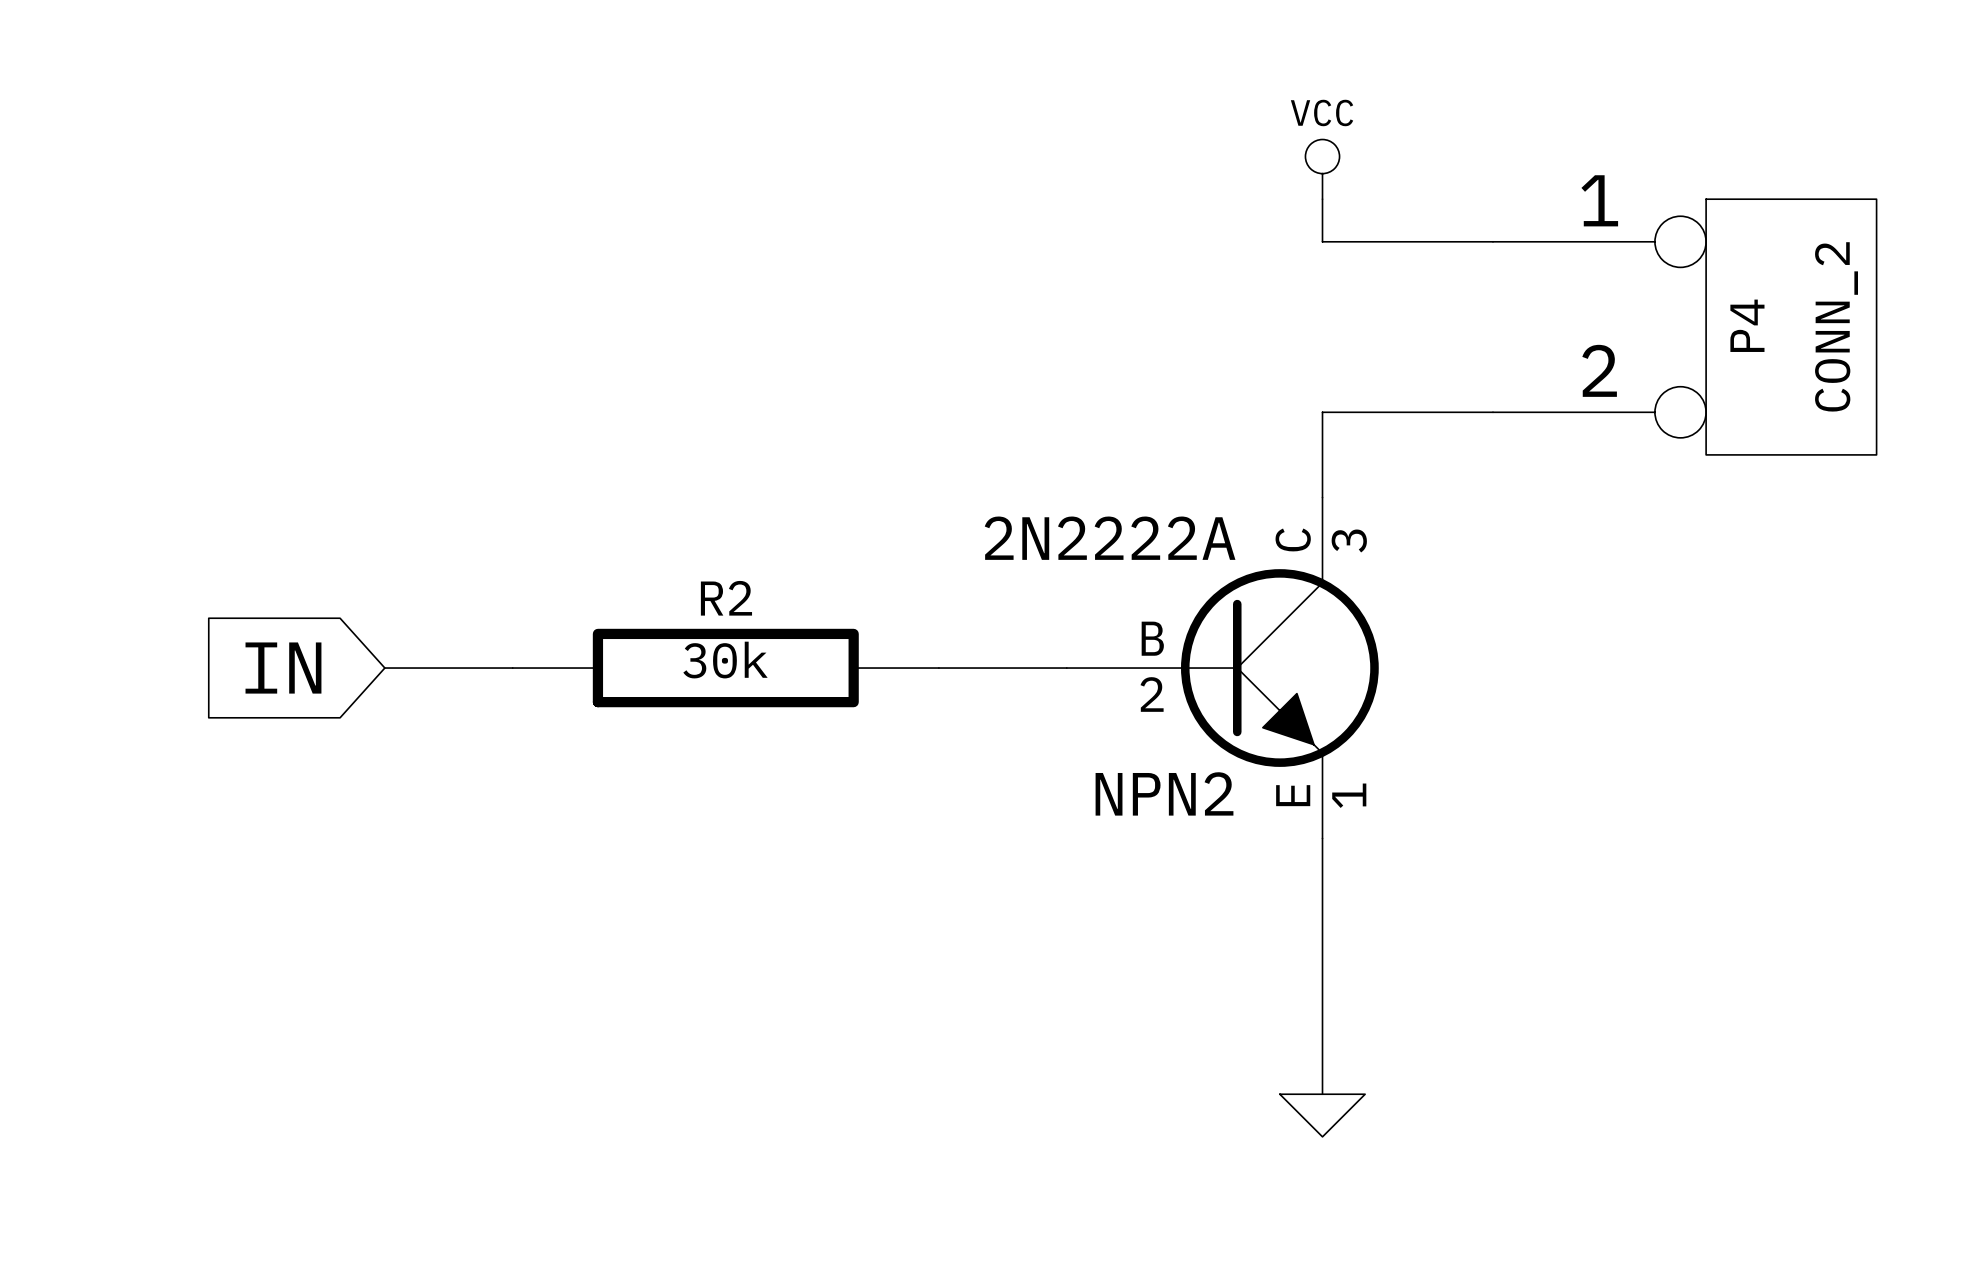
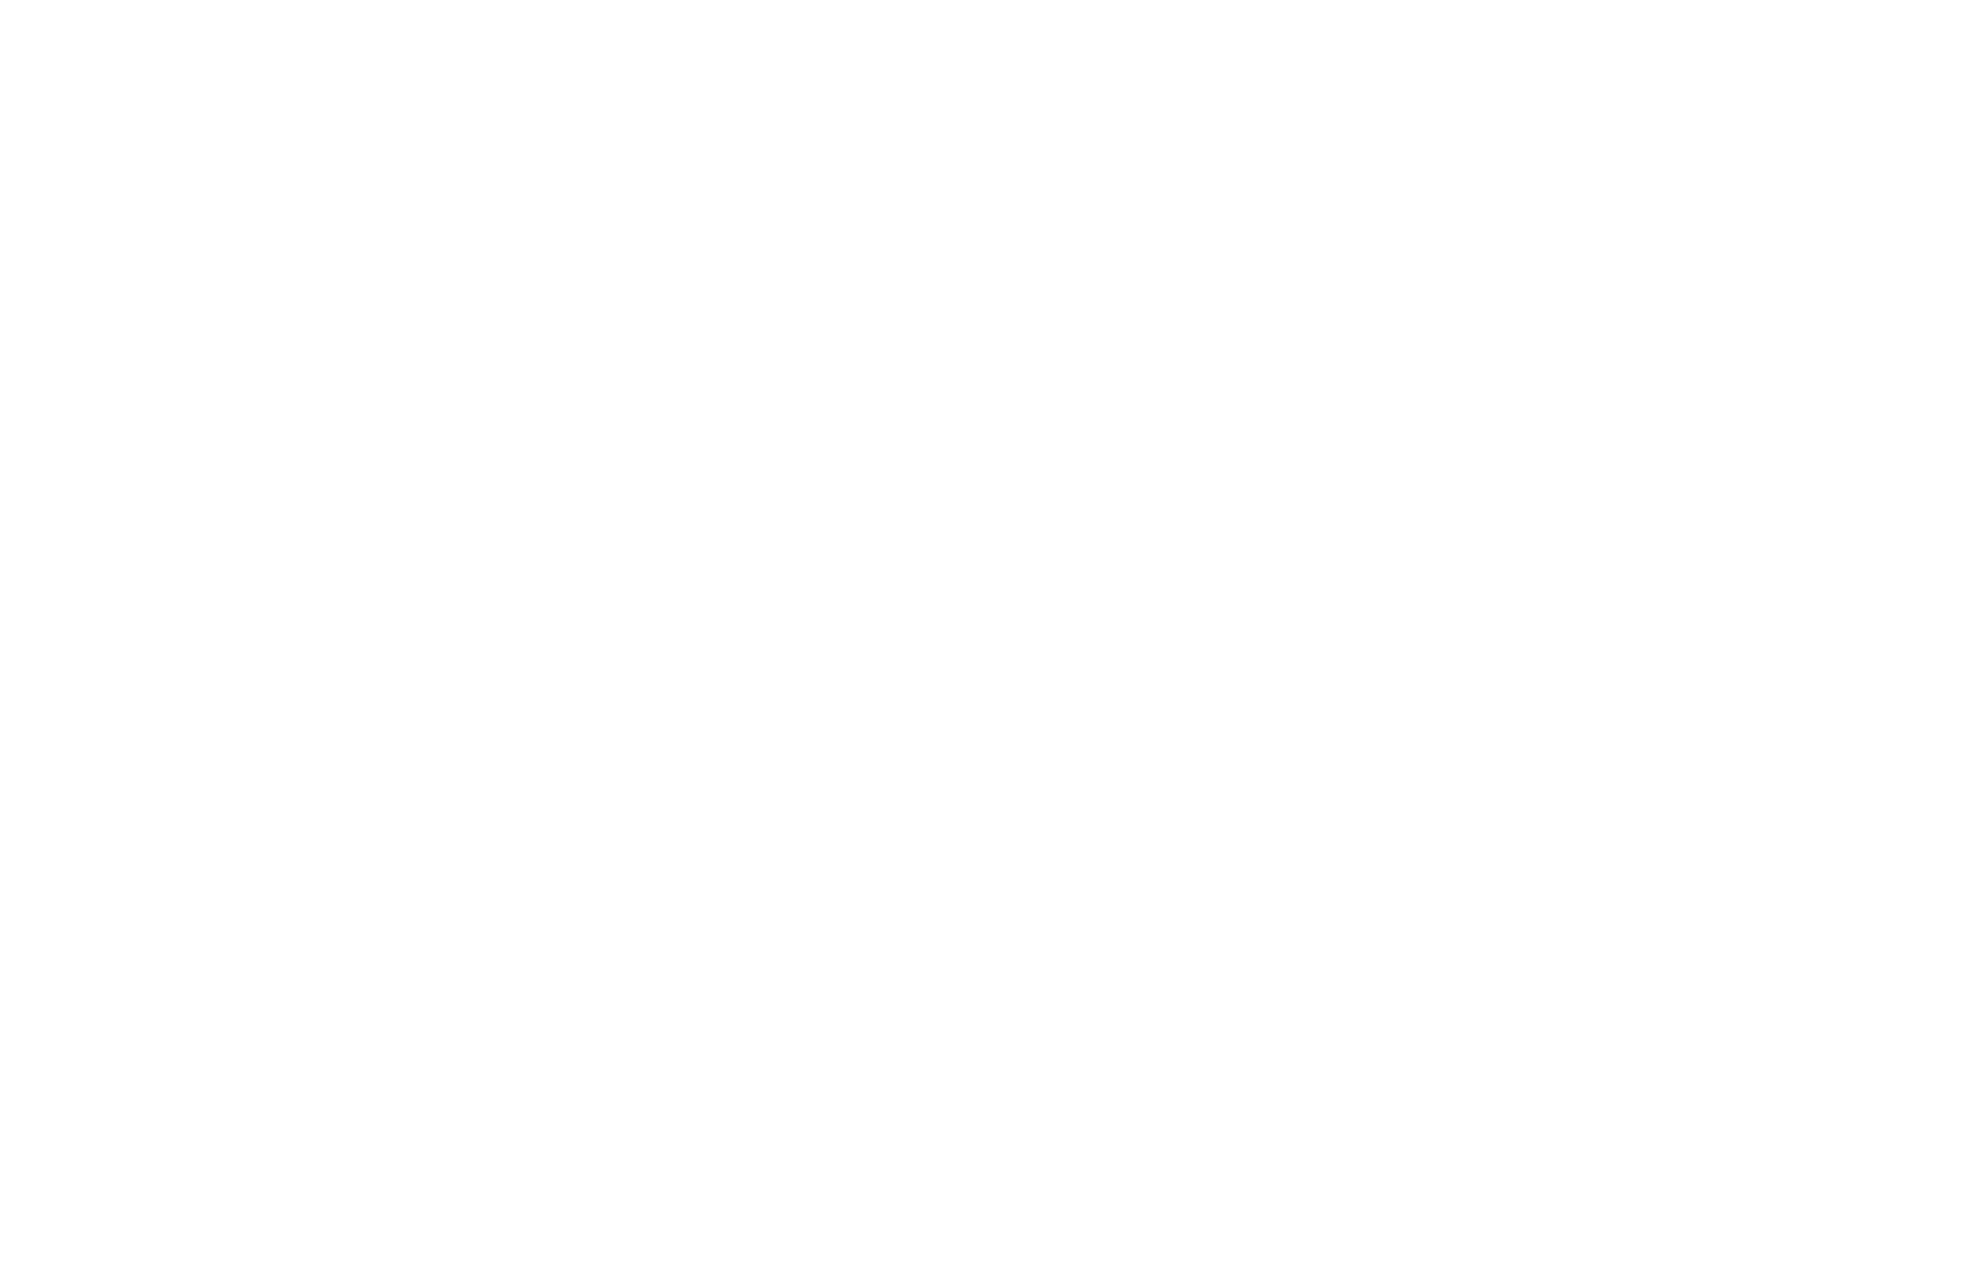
power symbol: VCC (1322, 169) -> none
wire: (1322, 199) (1322, 241) (1492, 241) -> none
P4: CONN_2 (1684, 327) -> none
wire: (1492, 412) (1322, 412) (1322, 497) -> none
global label: IN (283, 668) -> none
wire: (384, 668) (512, 668) -> none
R2: 30k (725, 668) -> none
wire: (938, 668) (1066, 668) -> none
NPN2: 2N2222A (1222, 668) -> none
wire: (1322, 838) (1322, 1094) -> none
power symbol: (1322, 1115) -> none

